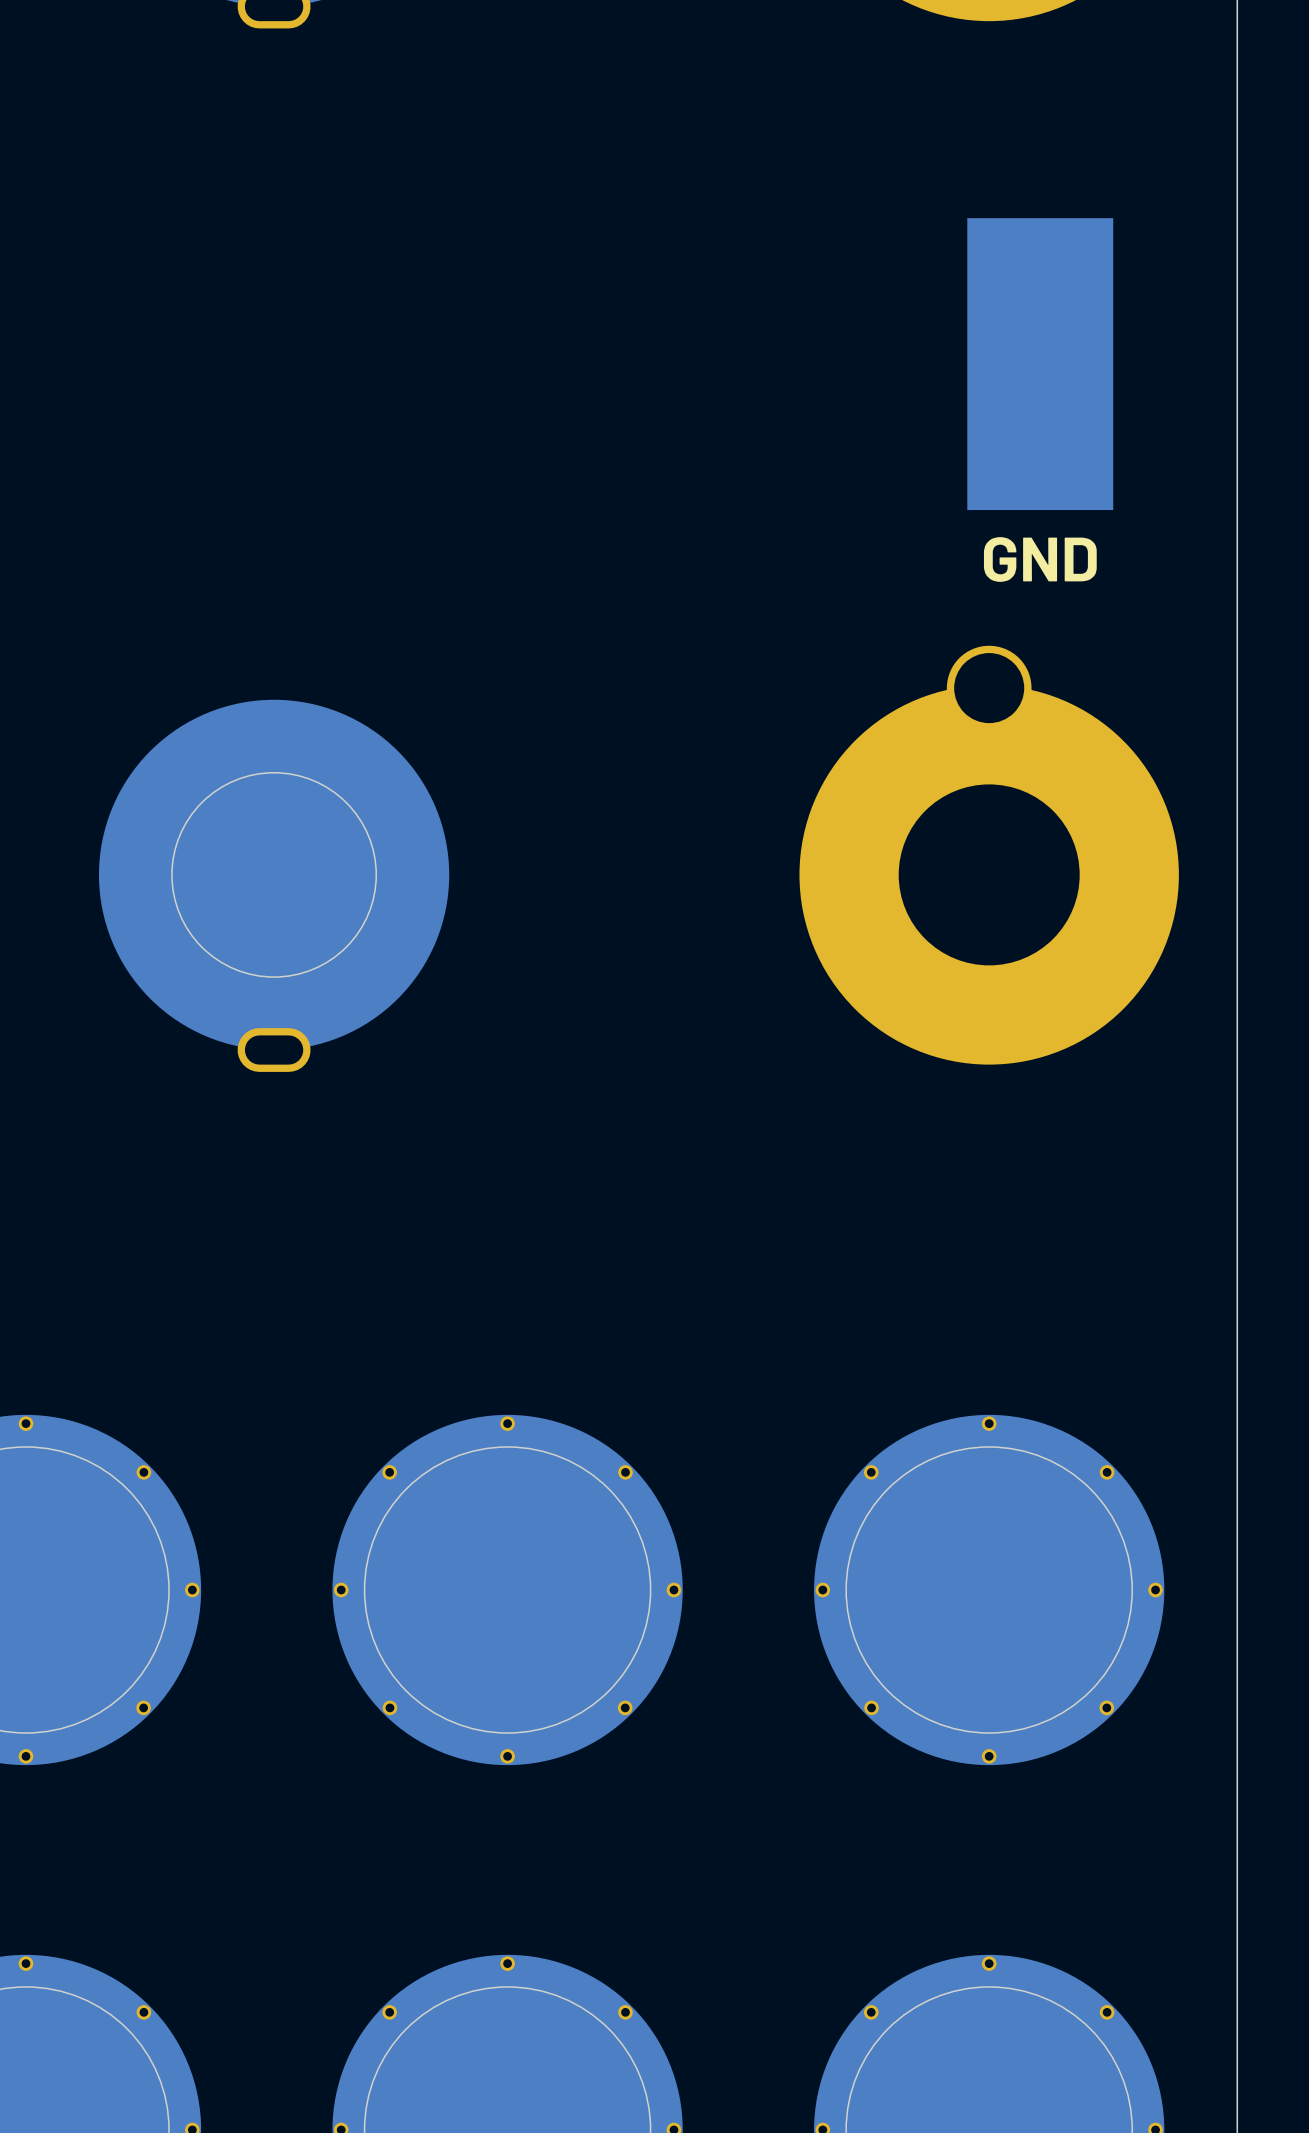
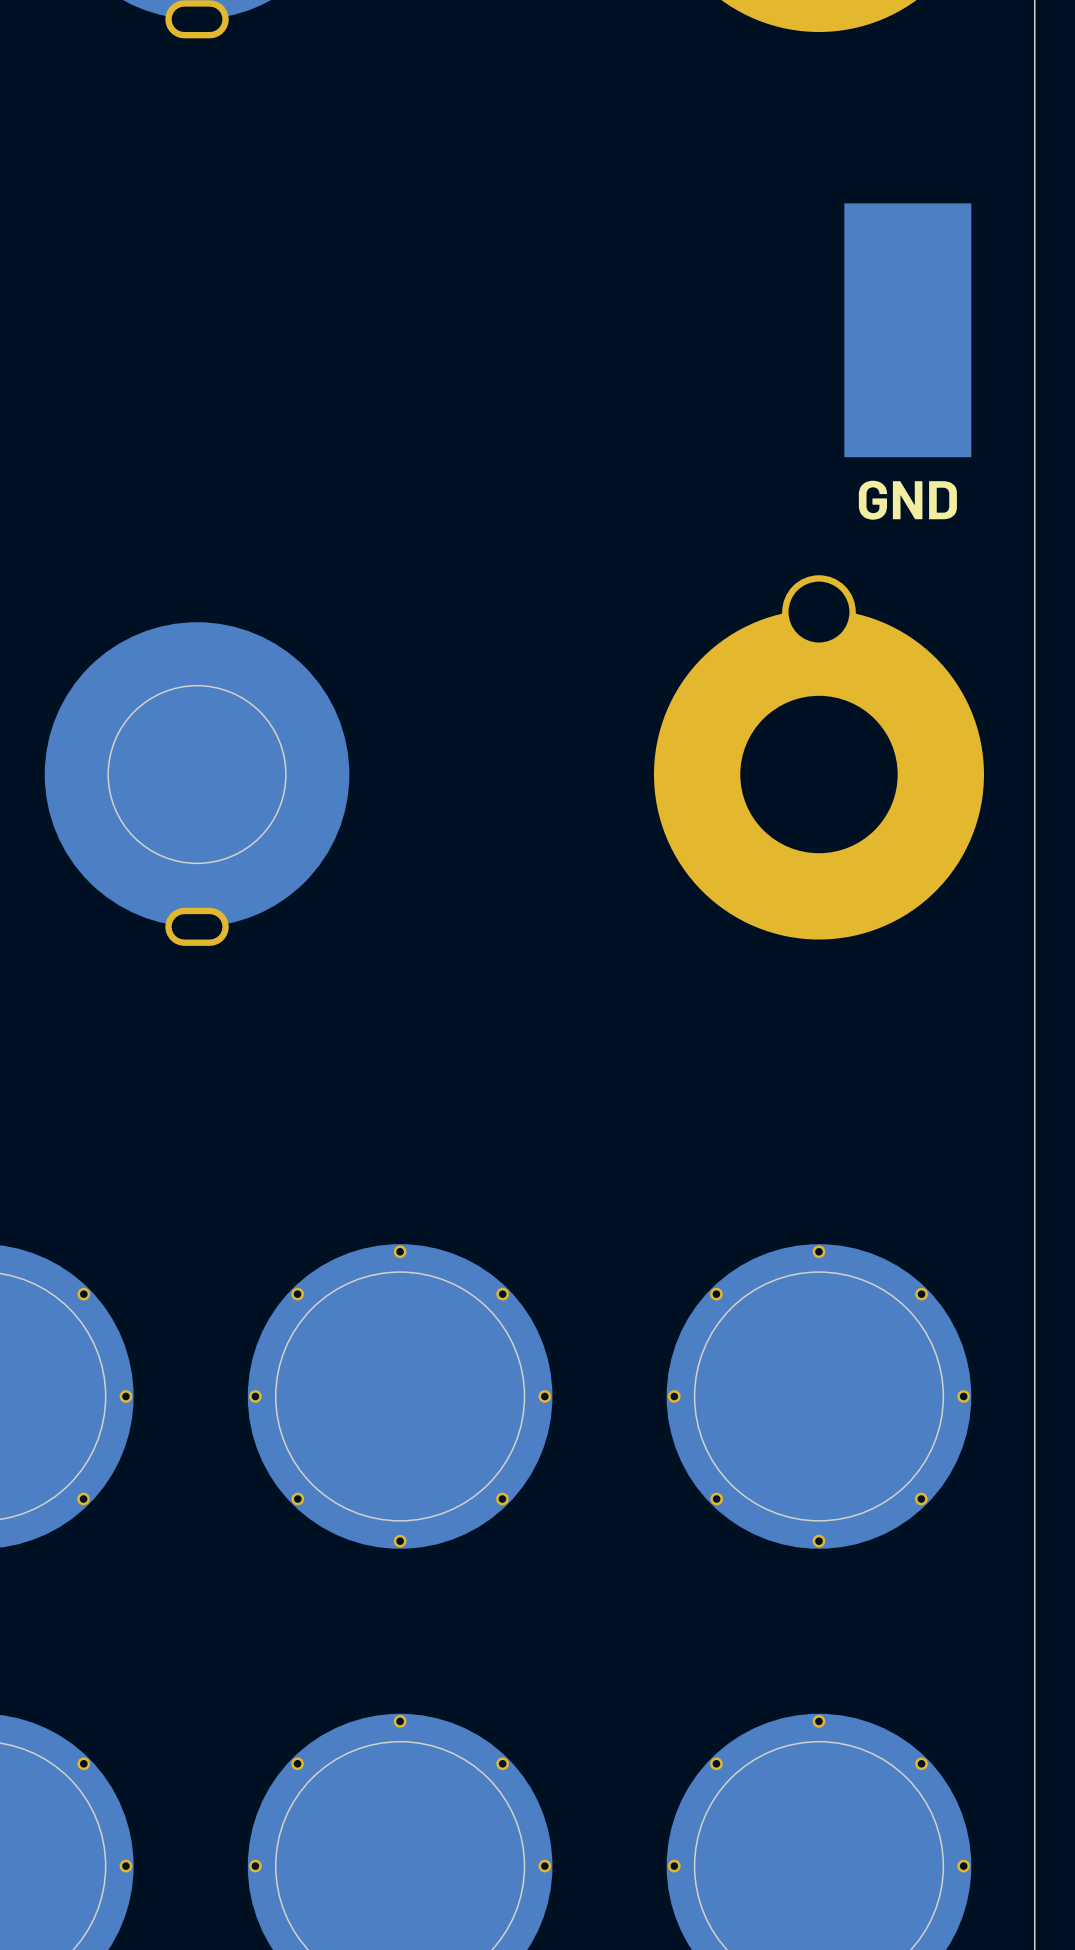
part position: (1040, 364) -> (907, 330)

